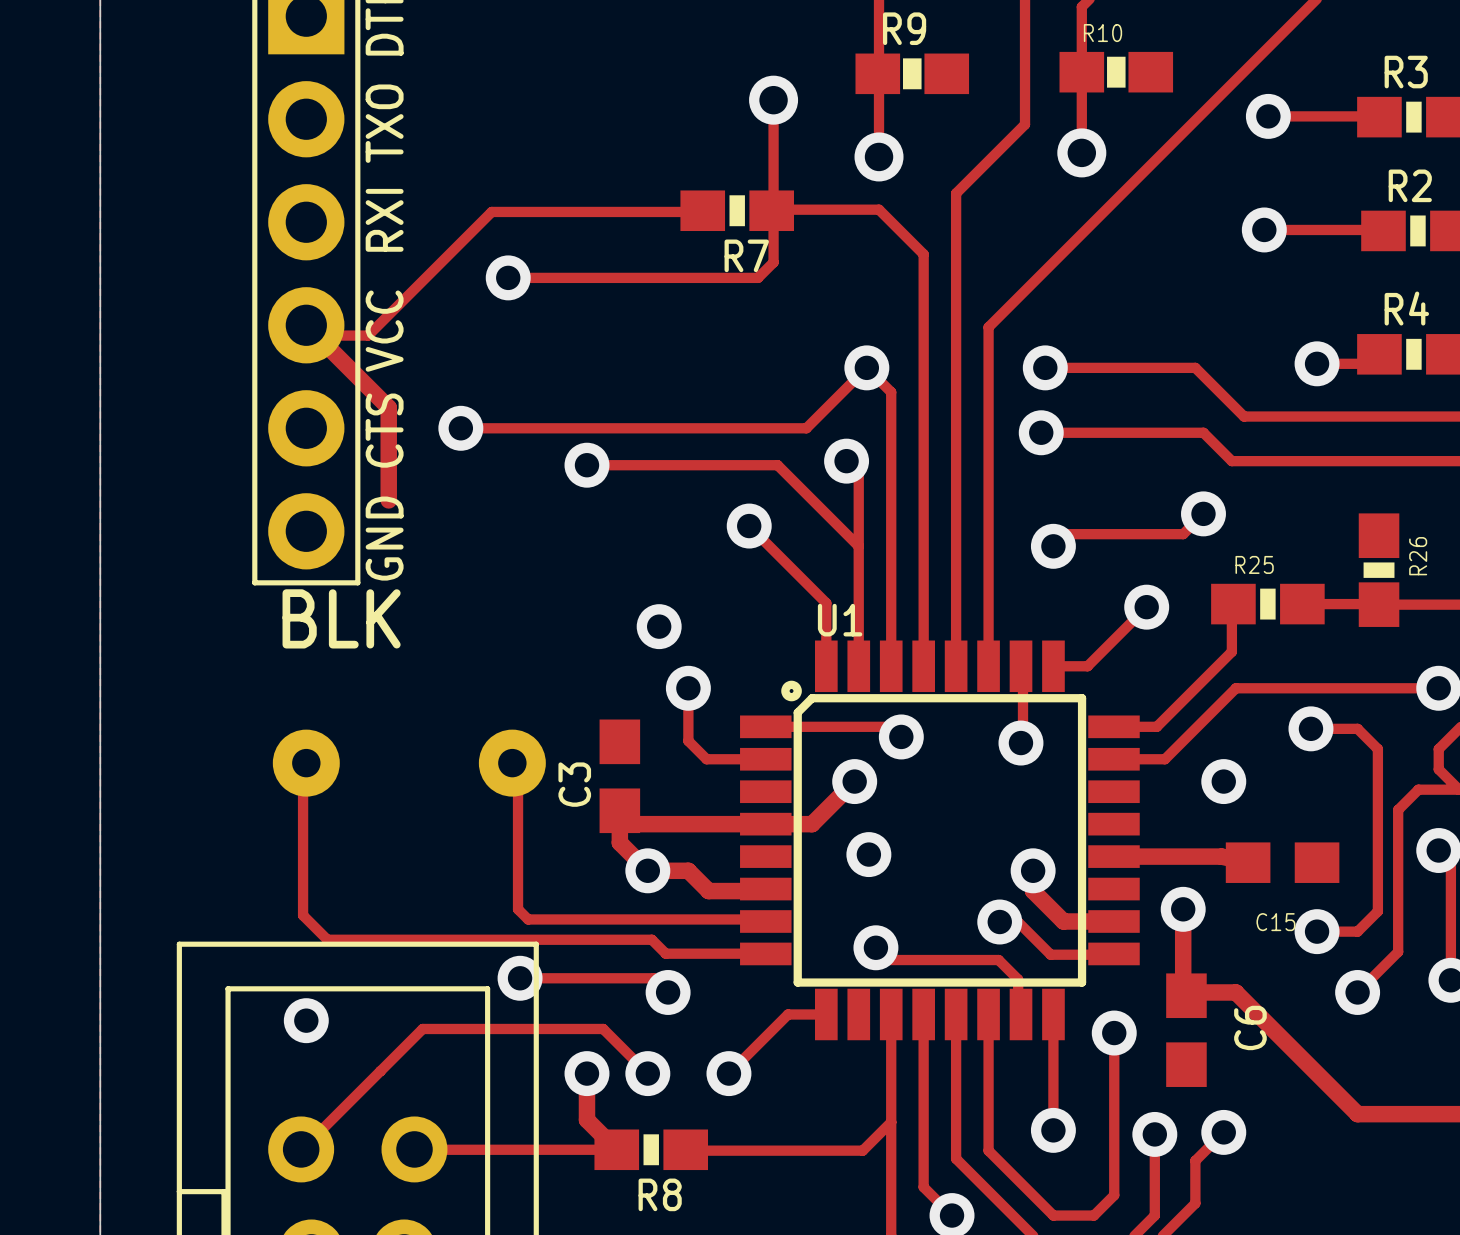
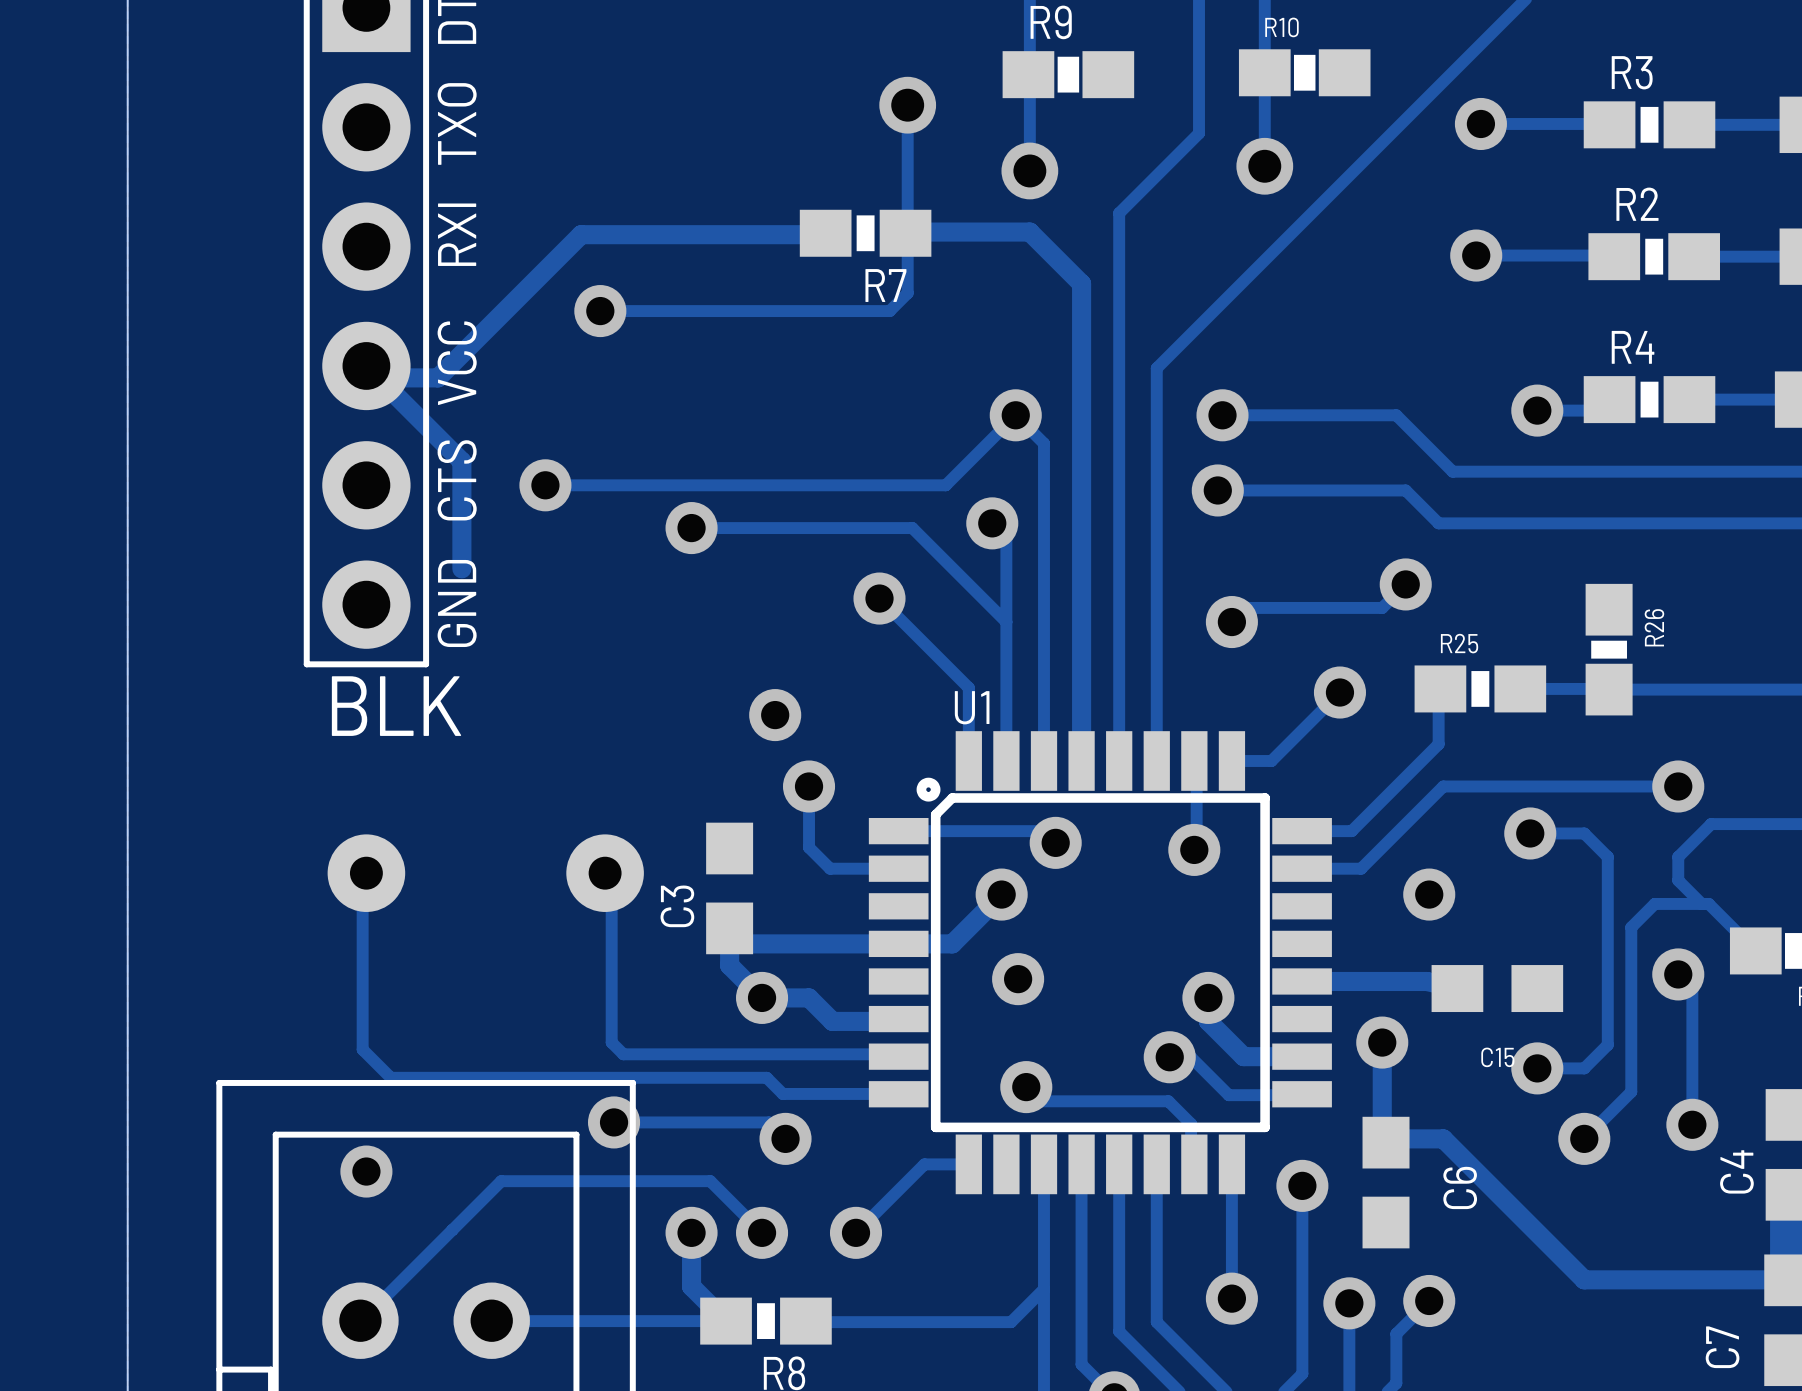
track width: thin (772, 209) (879, 209) (923, 254) (923, 666) -> thick (906, 232) (1029, 232) (1081, 283) (1081, 760)
track width: thin (701, 211) (491, 211) (368, 335) (316, 335) -> thick (824, 234) (581, 234) (438, 377) (378, 377)

